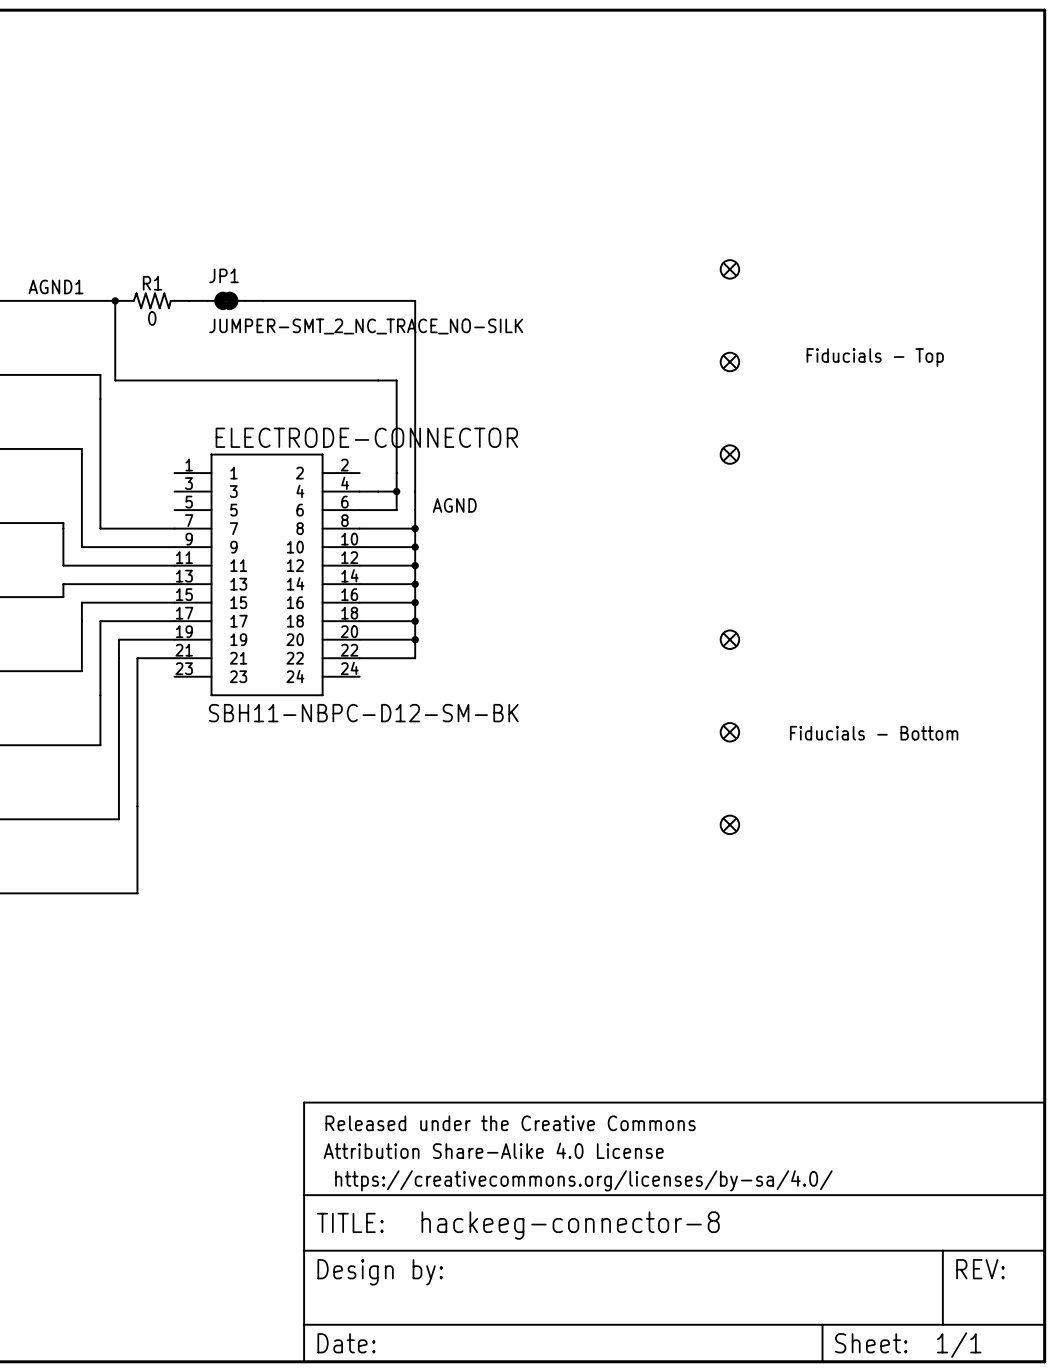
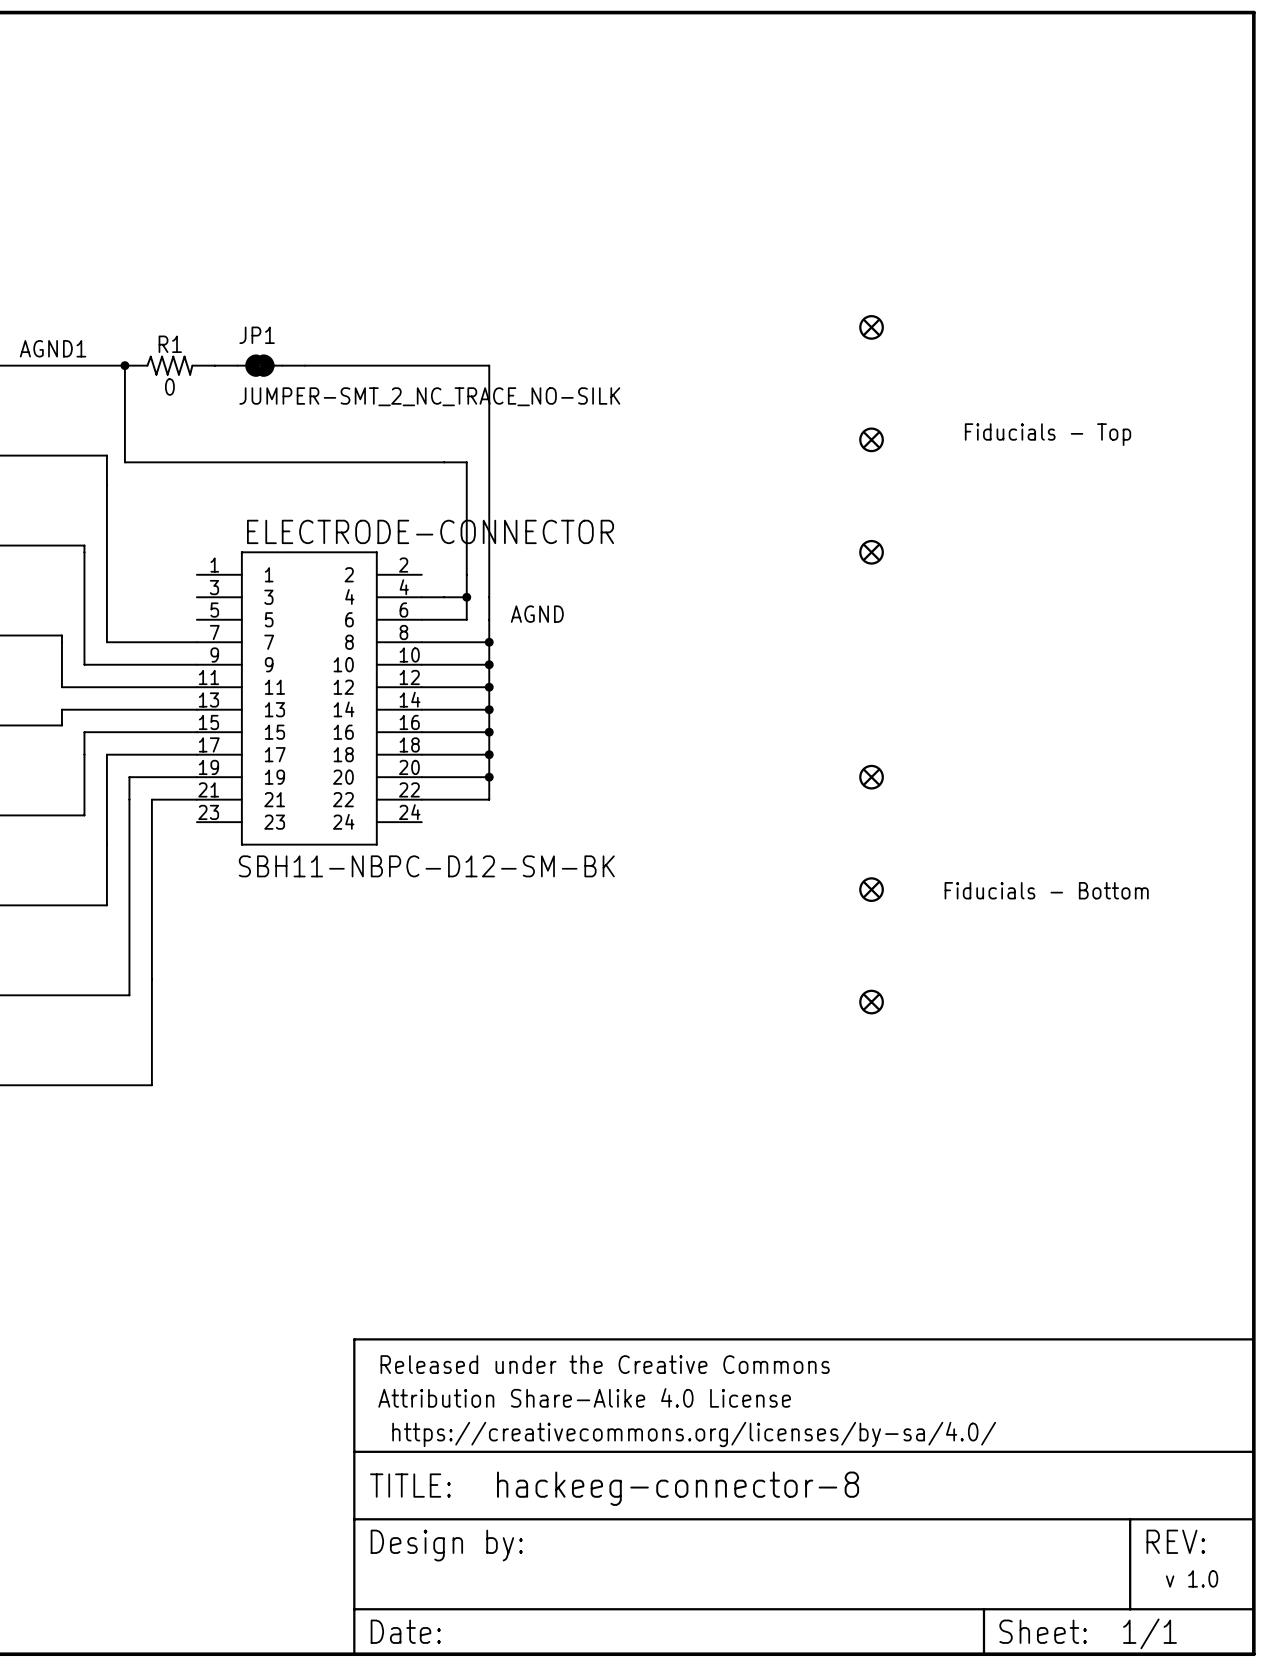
text: none -> v 1.0 (1192, 1578)

